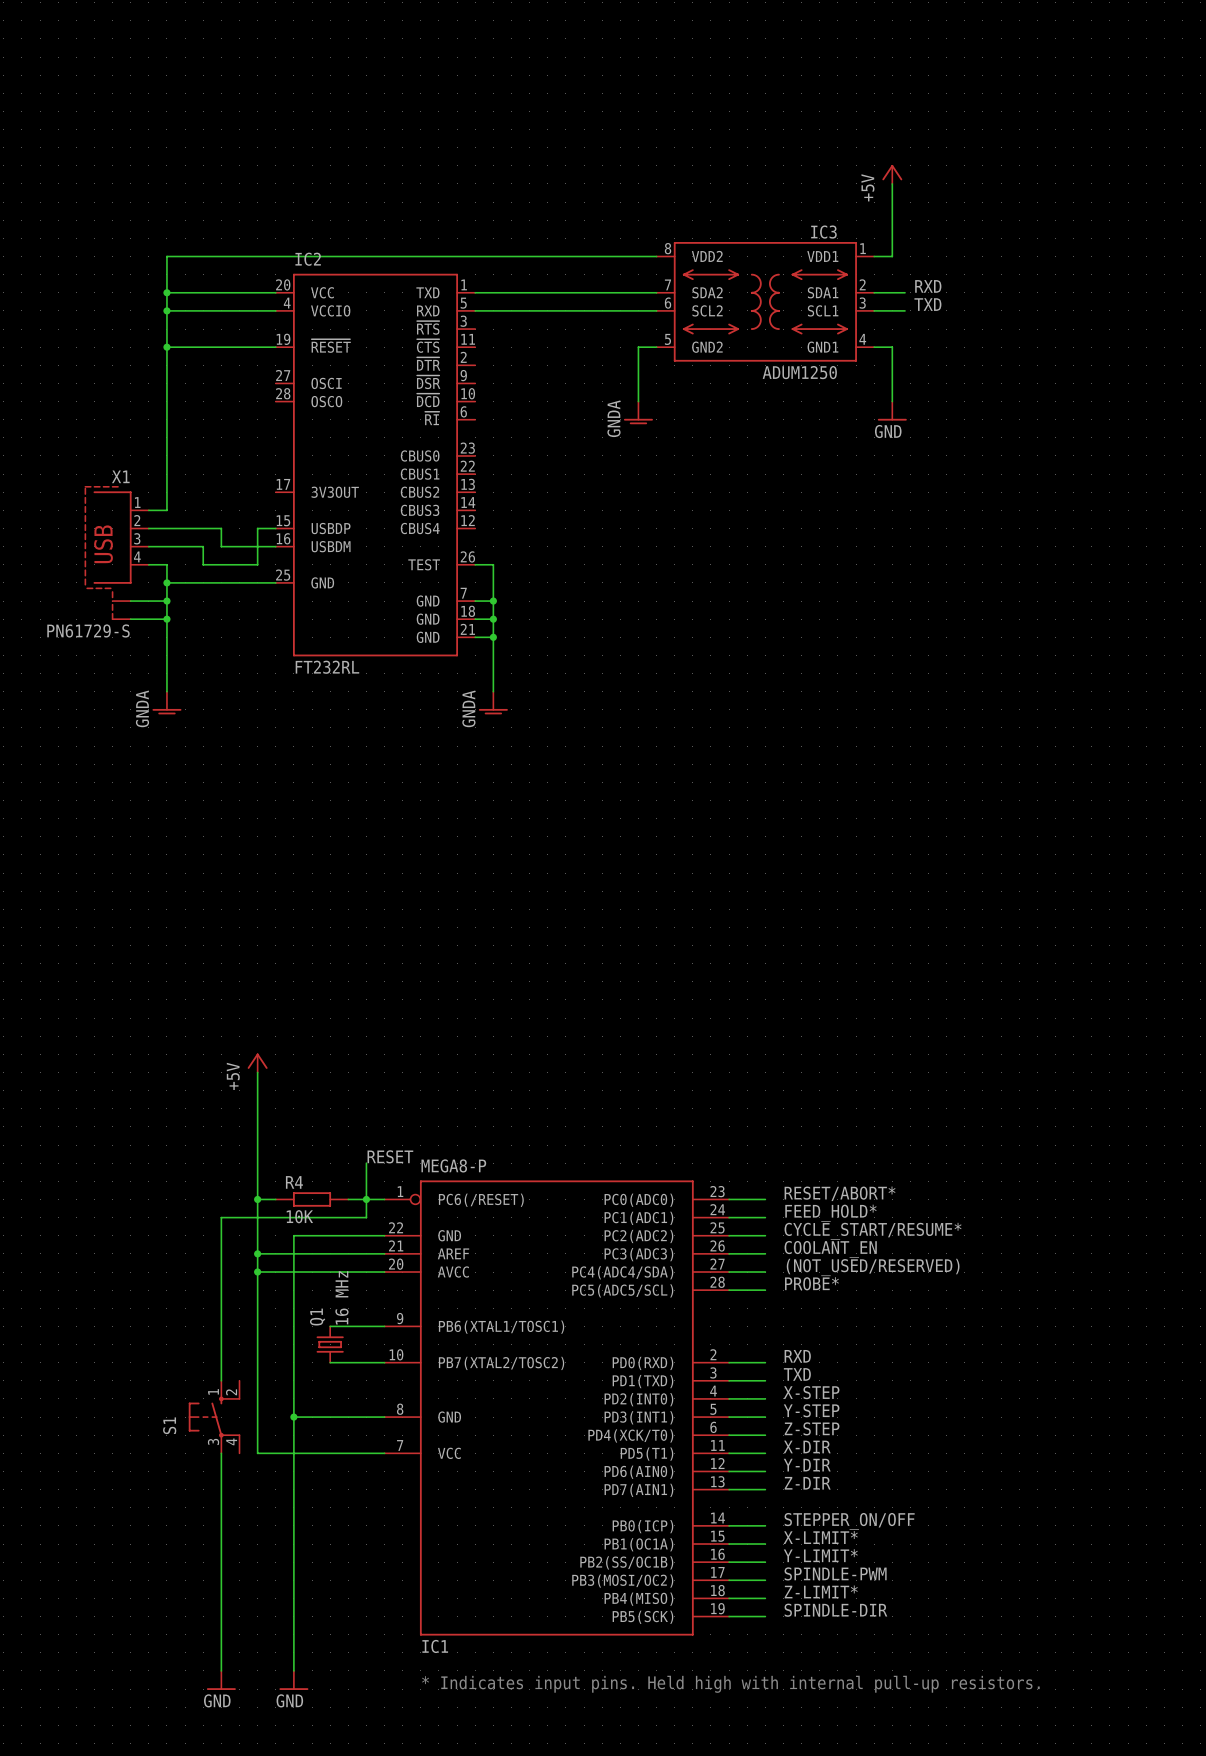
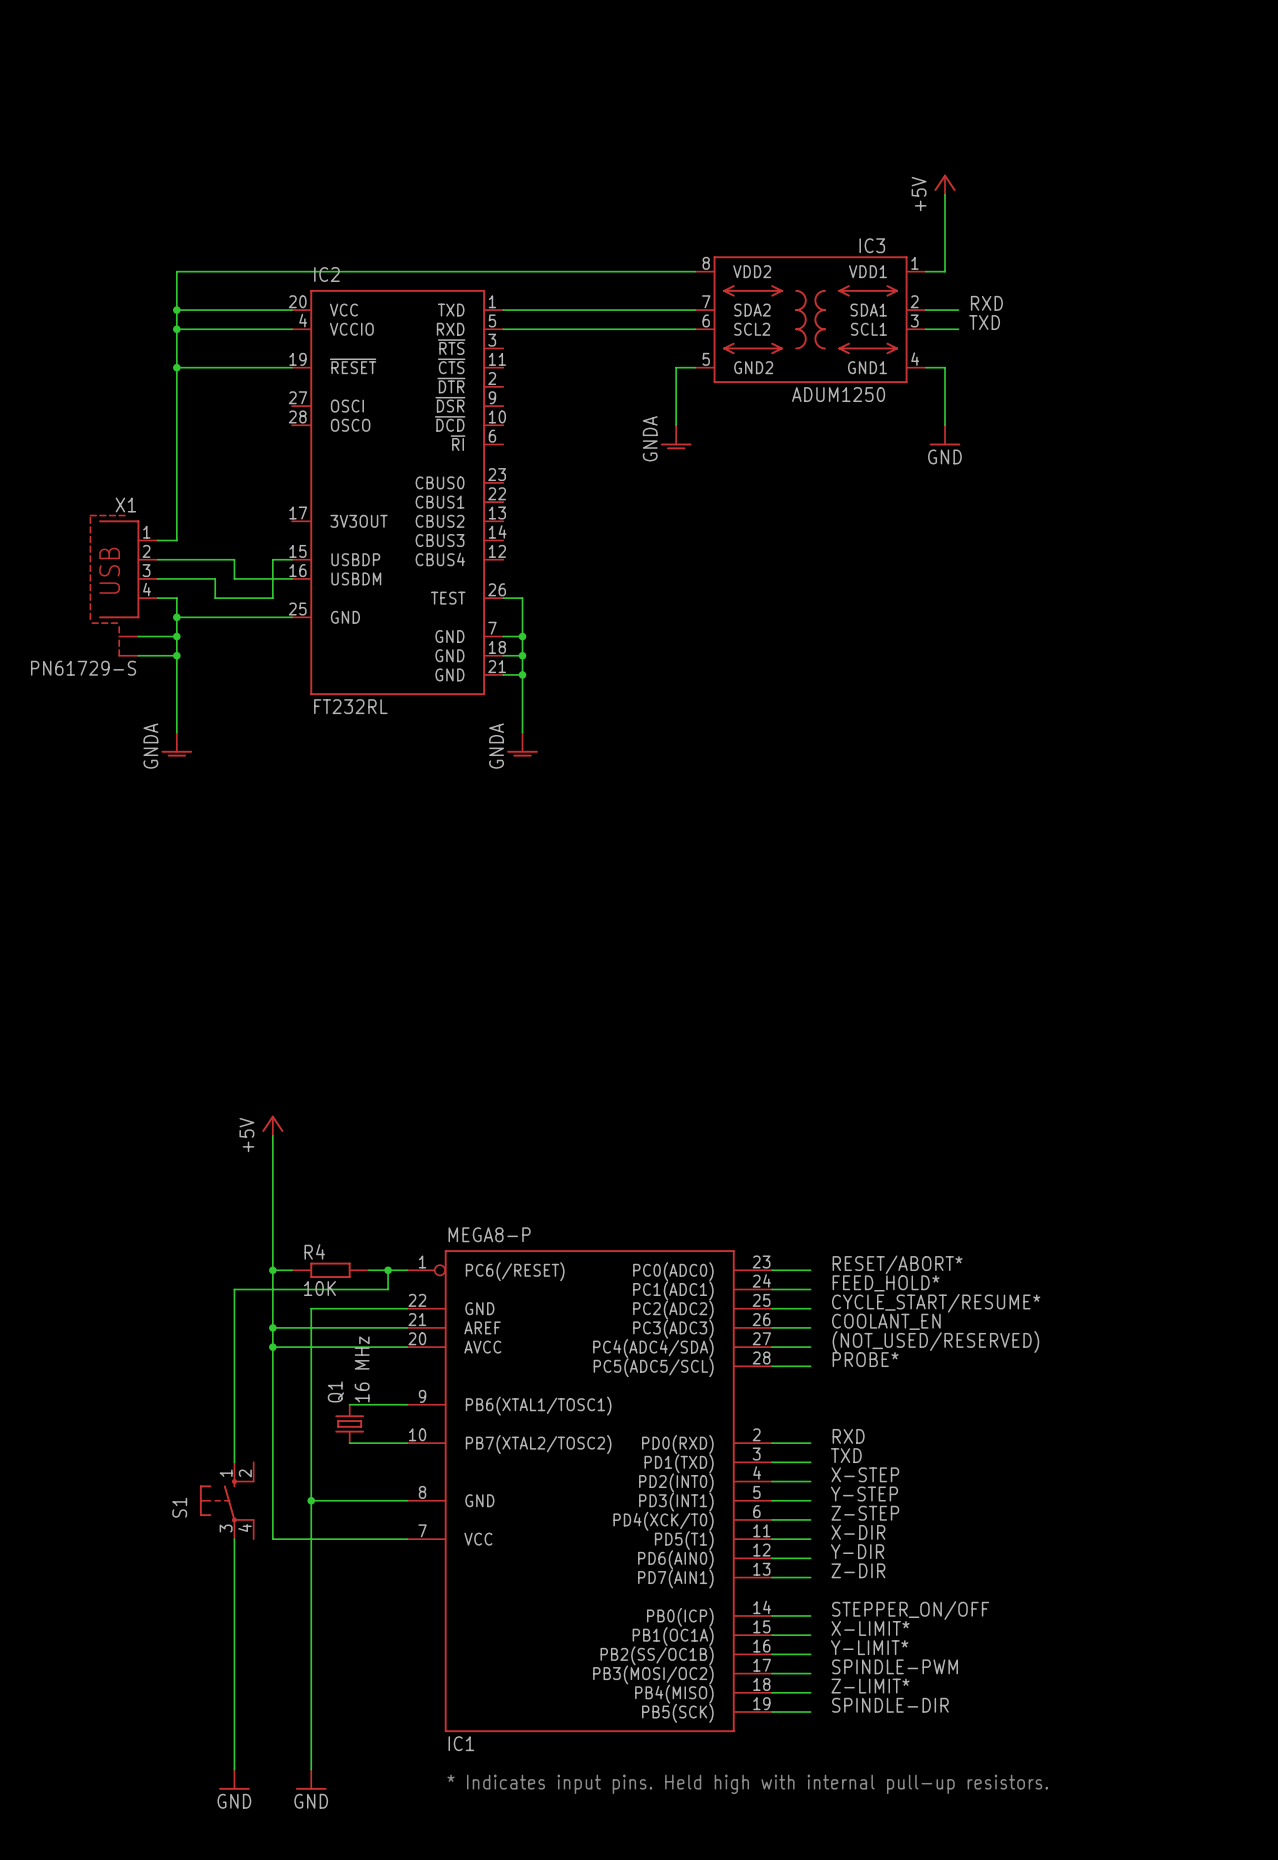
label: RESET (390, 1156) -> none
wire: (366, 1163) (366, 1199) -> none

